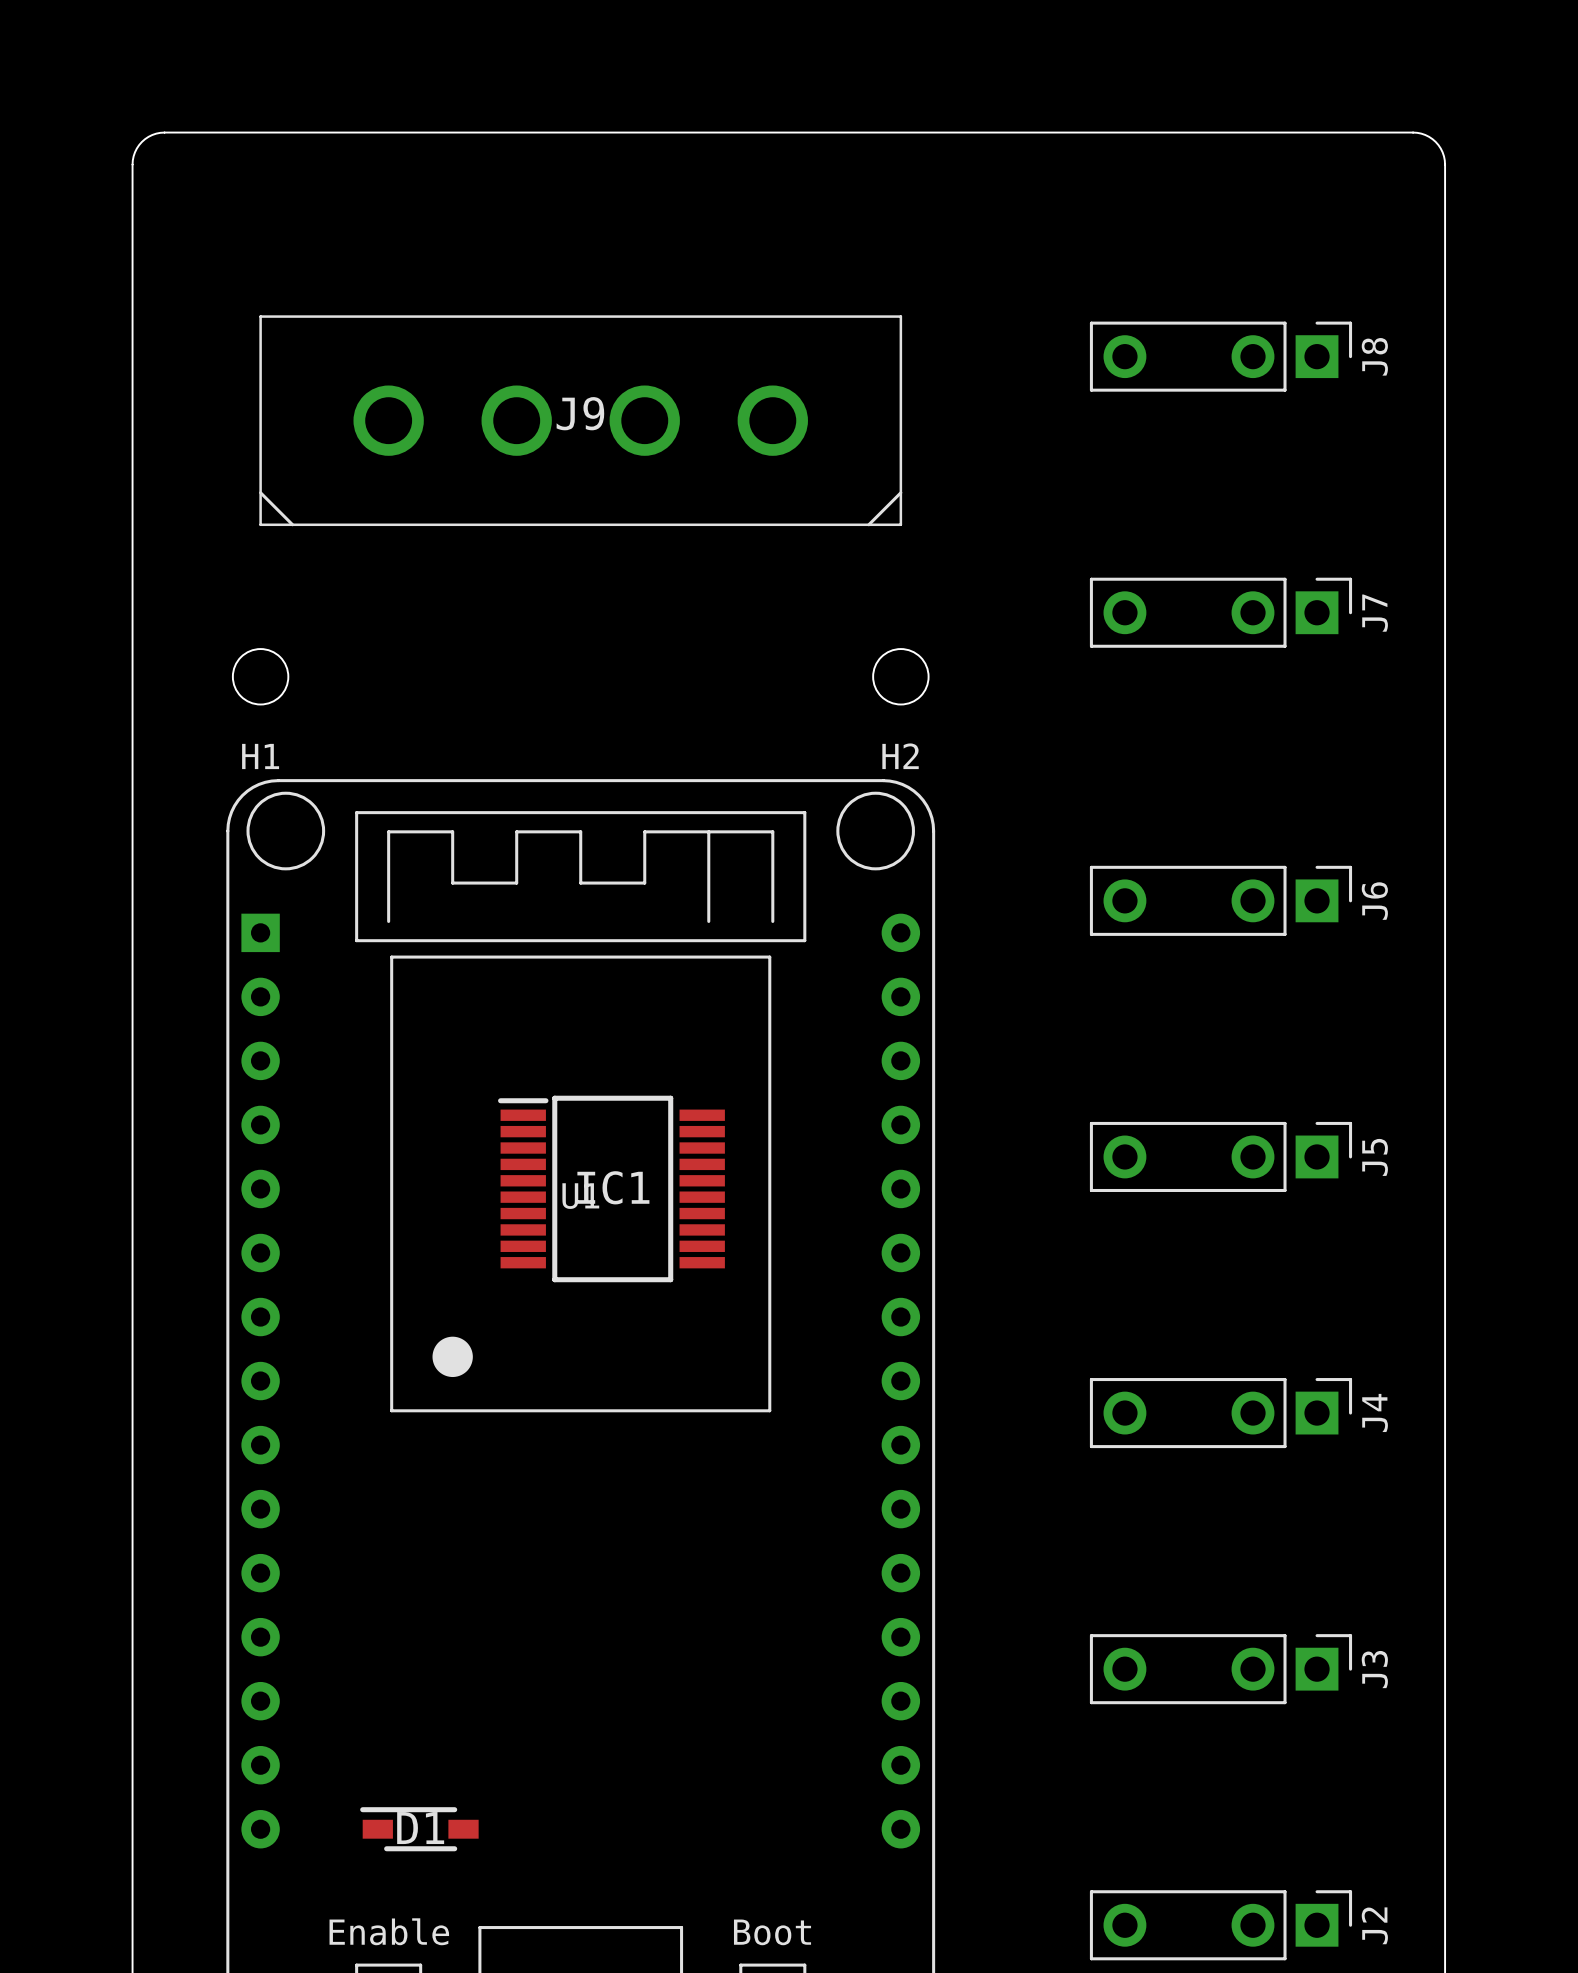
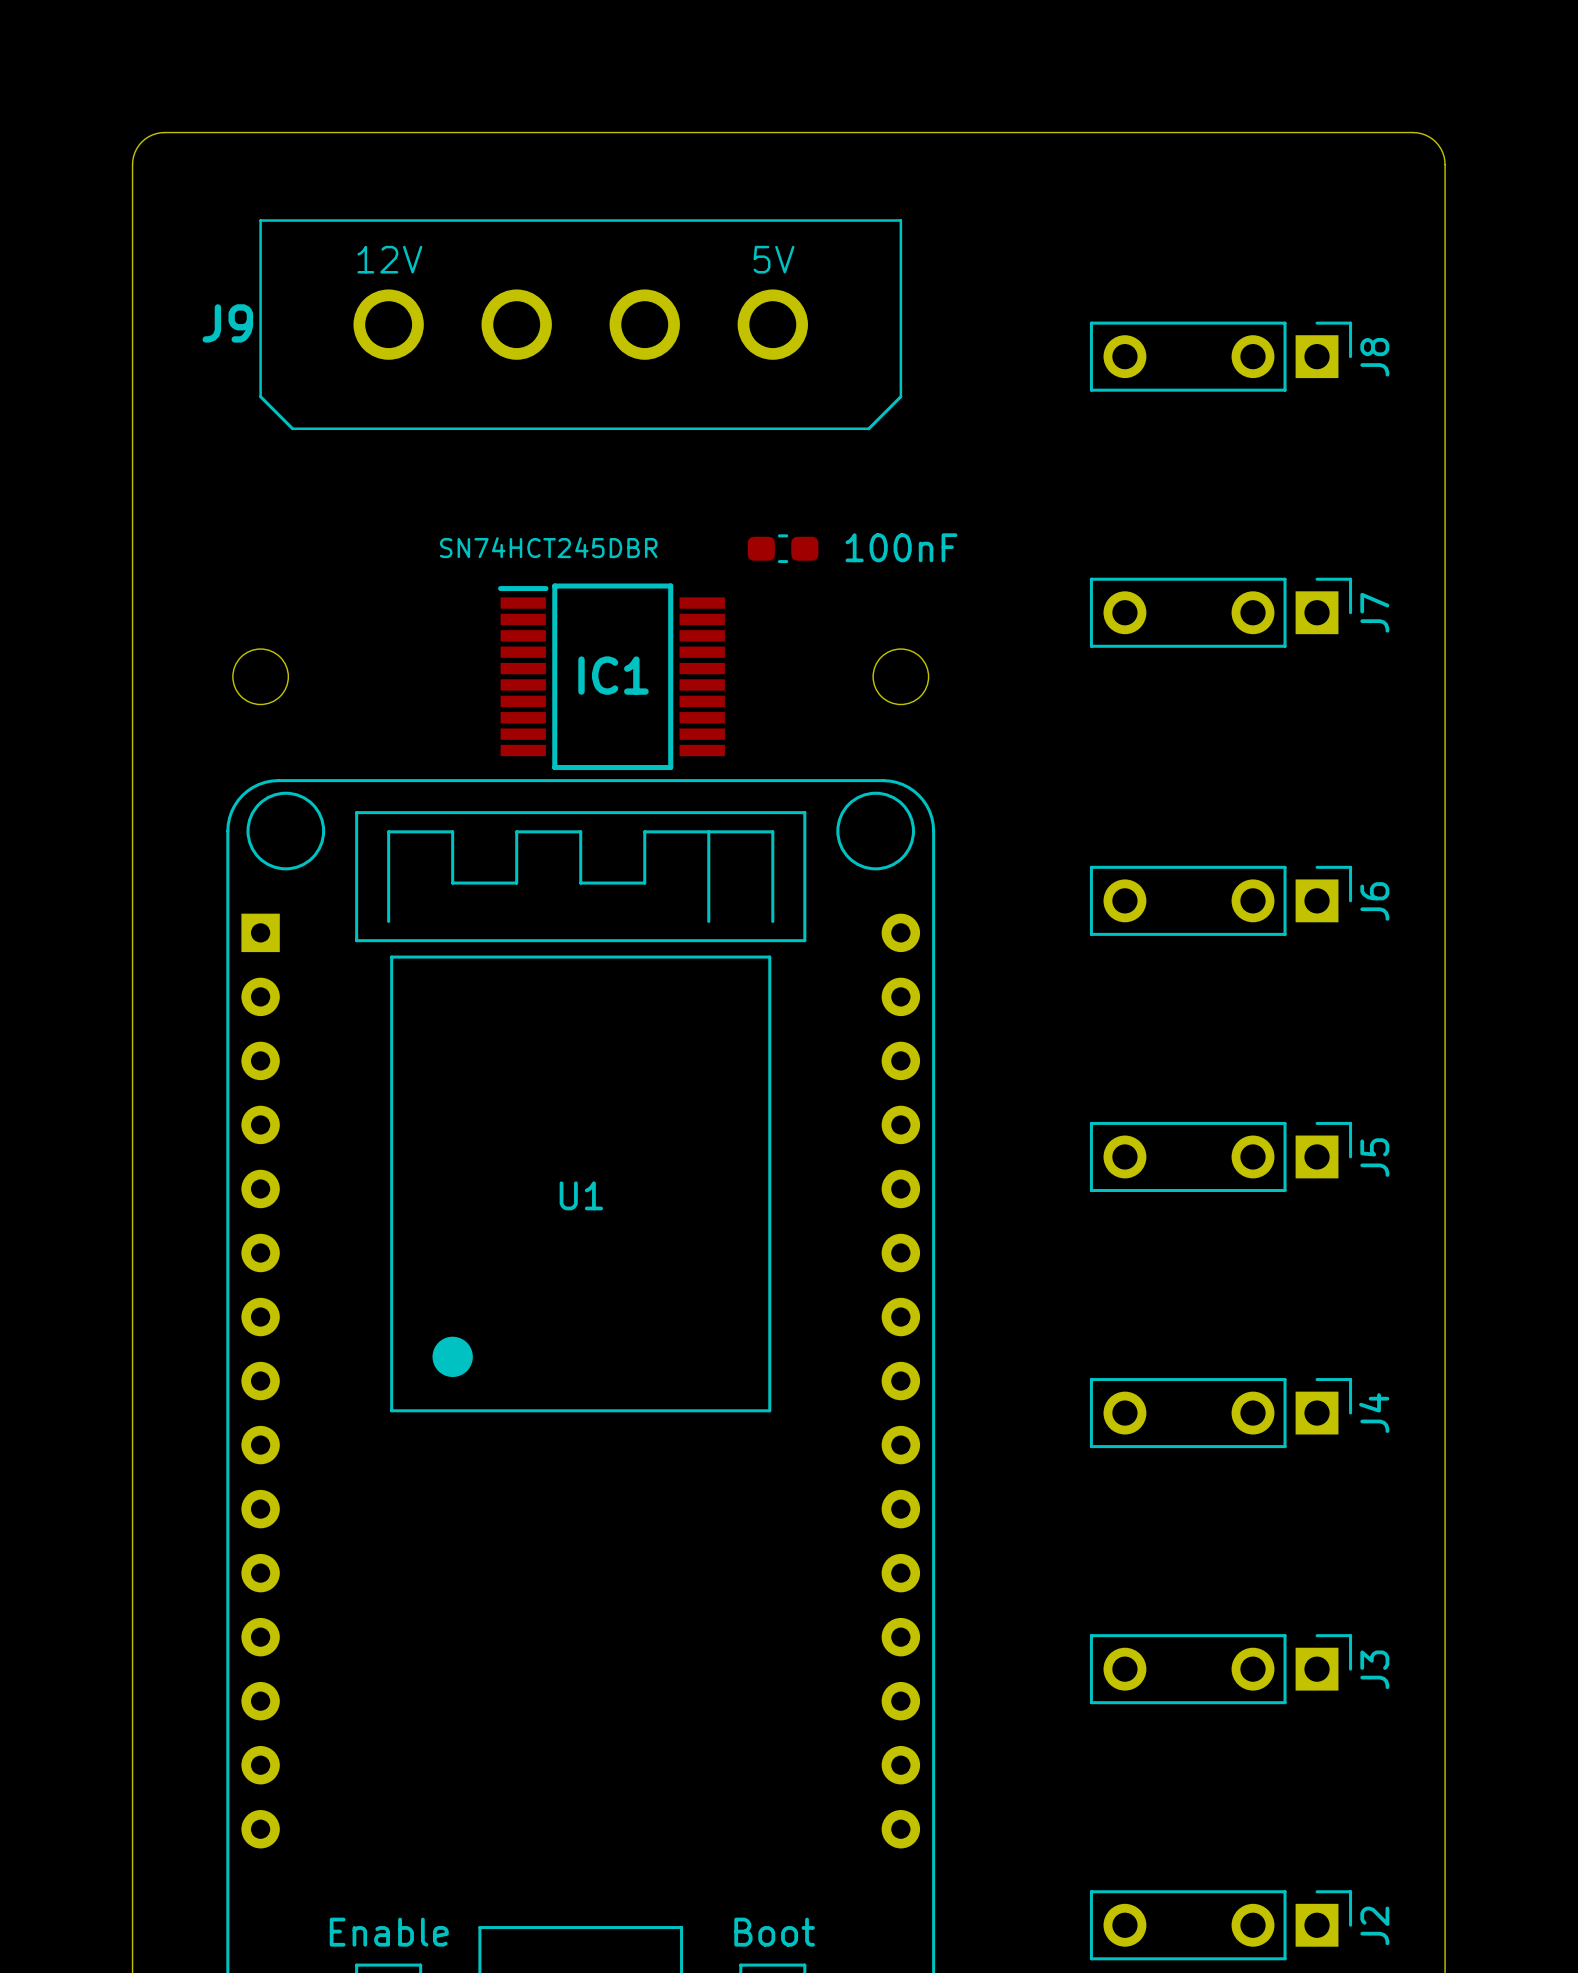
text: none -> 12V (389, 259)
text: none -> 5V (774, 259)
J9 footprint: [259, 315, 903, 527] -> [259, 219, 903, 431]
J9 name position: J9 (580, 413) -> J9 (227, 323)
IC1 value: none -> SN74HCT245DBR (548, 547)
100nF: none -> (783, 548)
H1 name: H1 (260, 756) -> none
H2 name: H2 (900, 756) -> none
IC1 position: (611, 1188) -> (611, 676)
D1: (419, 1829) -> none

